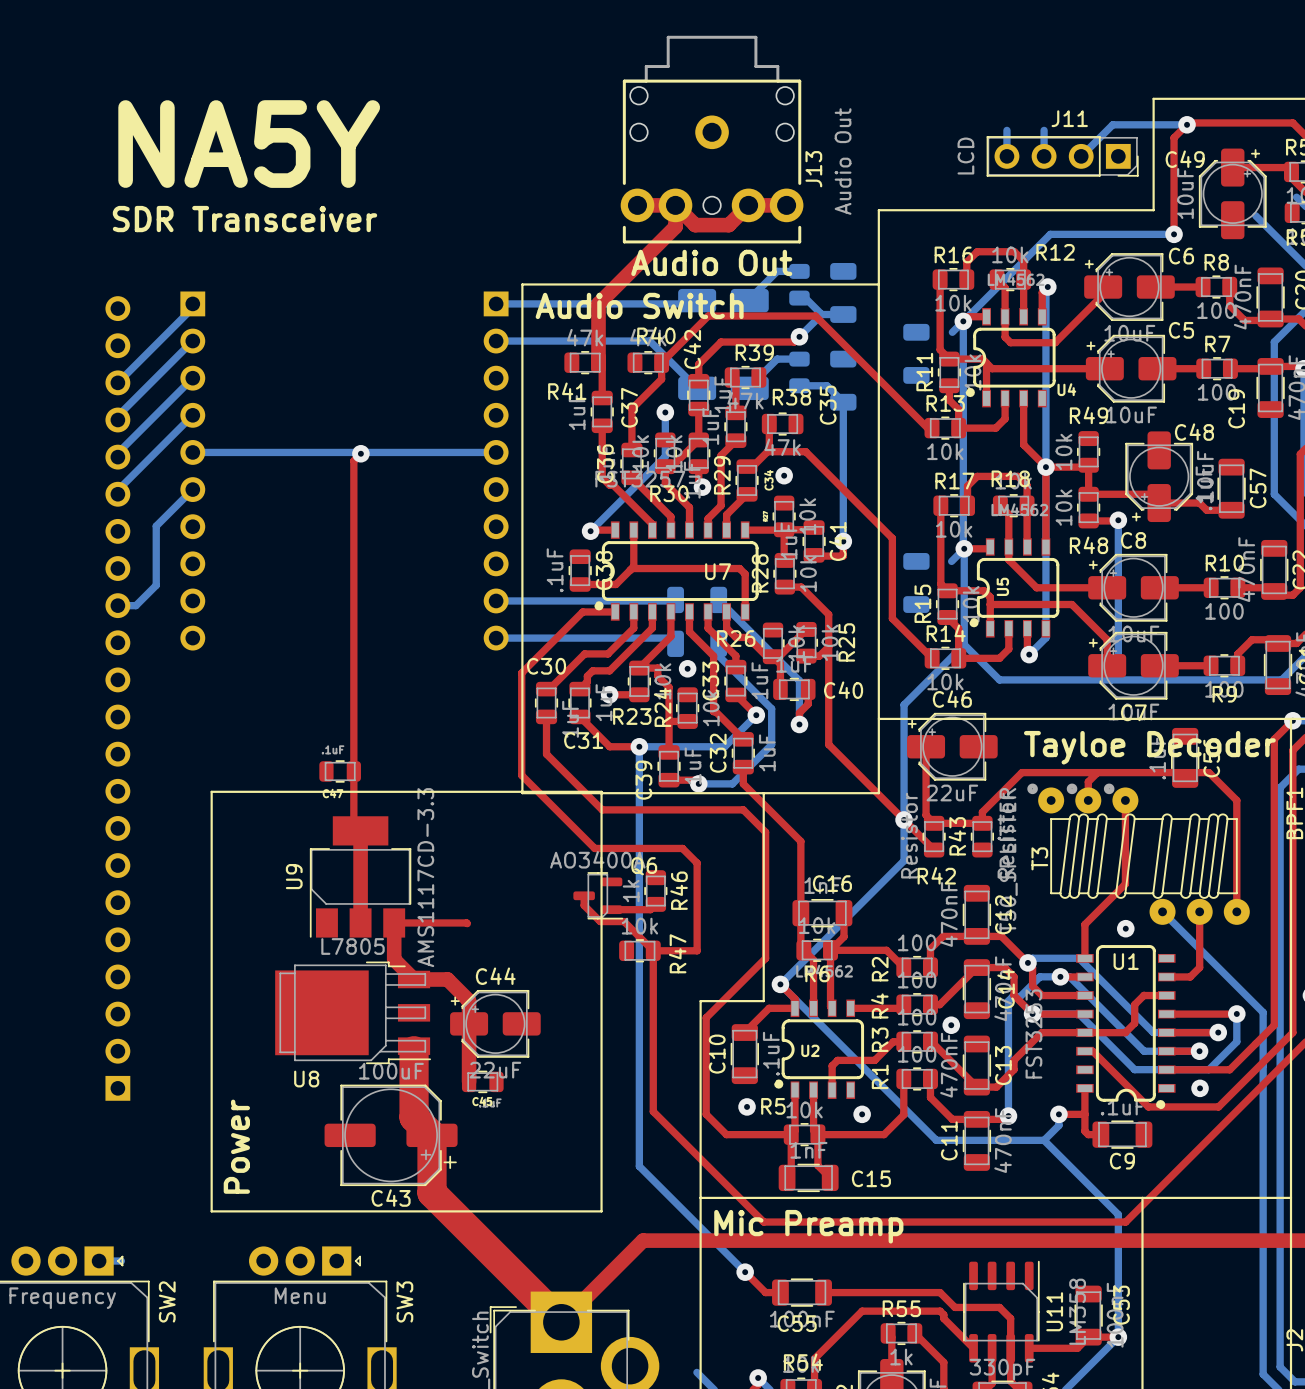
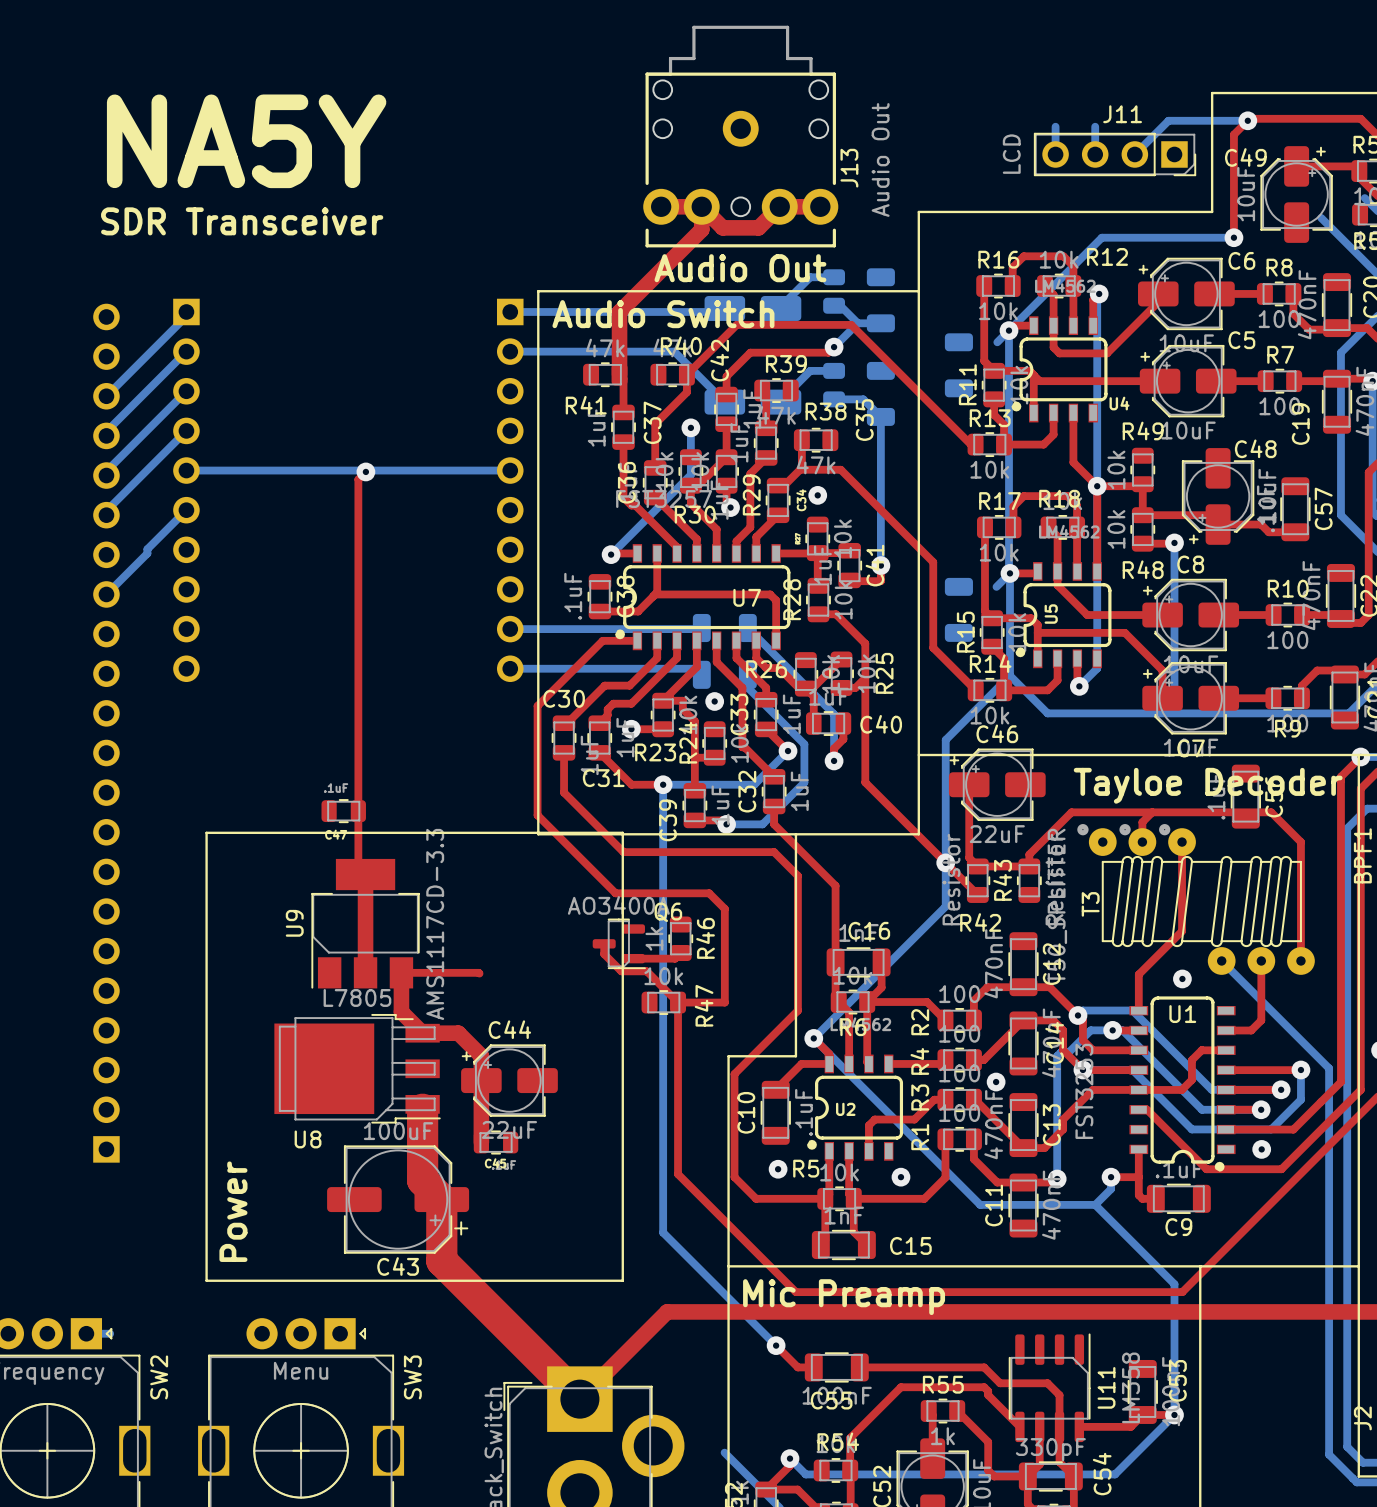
bottom track: (156, 530) (156, 585) (135, 605) (117, 605) -> (147, 553) (106, 594)

